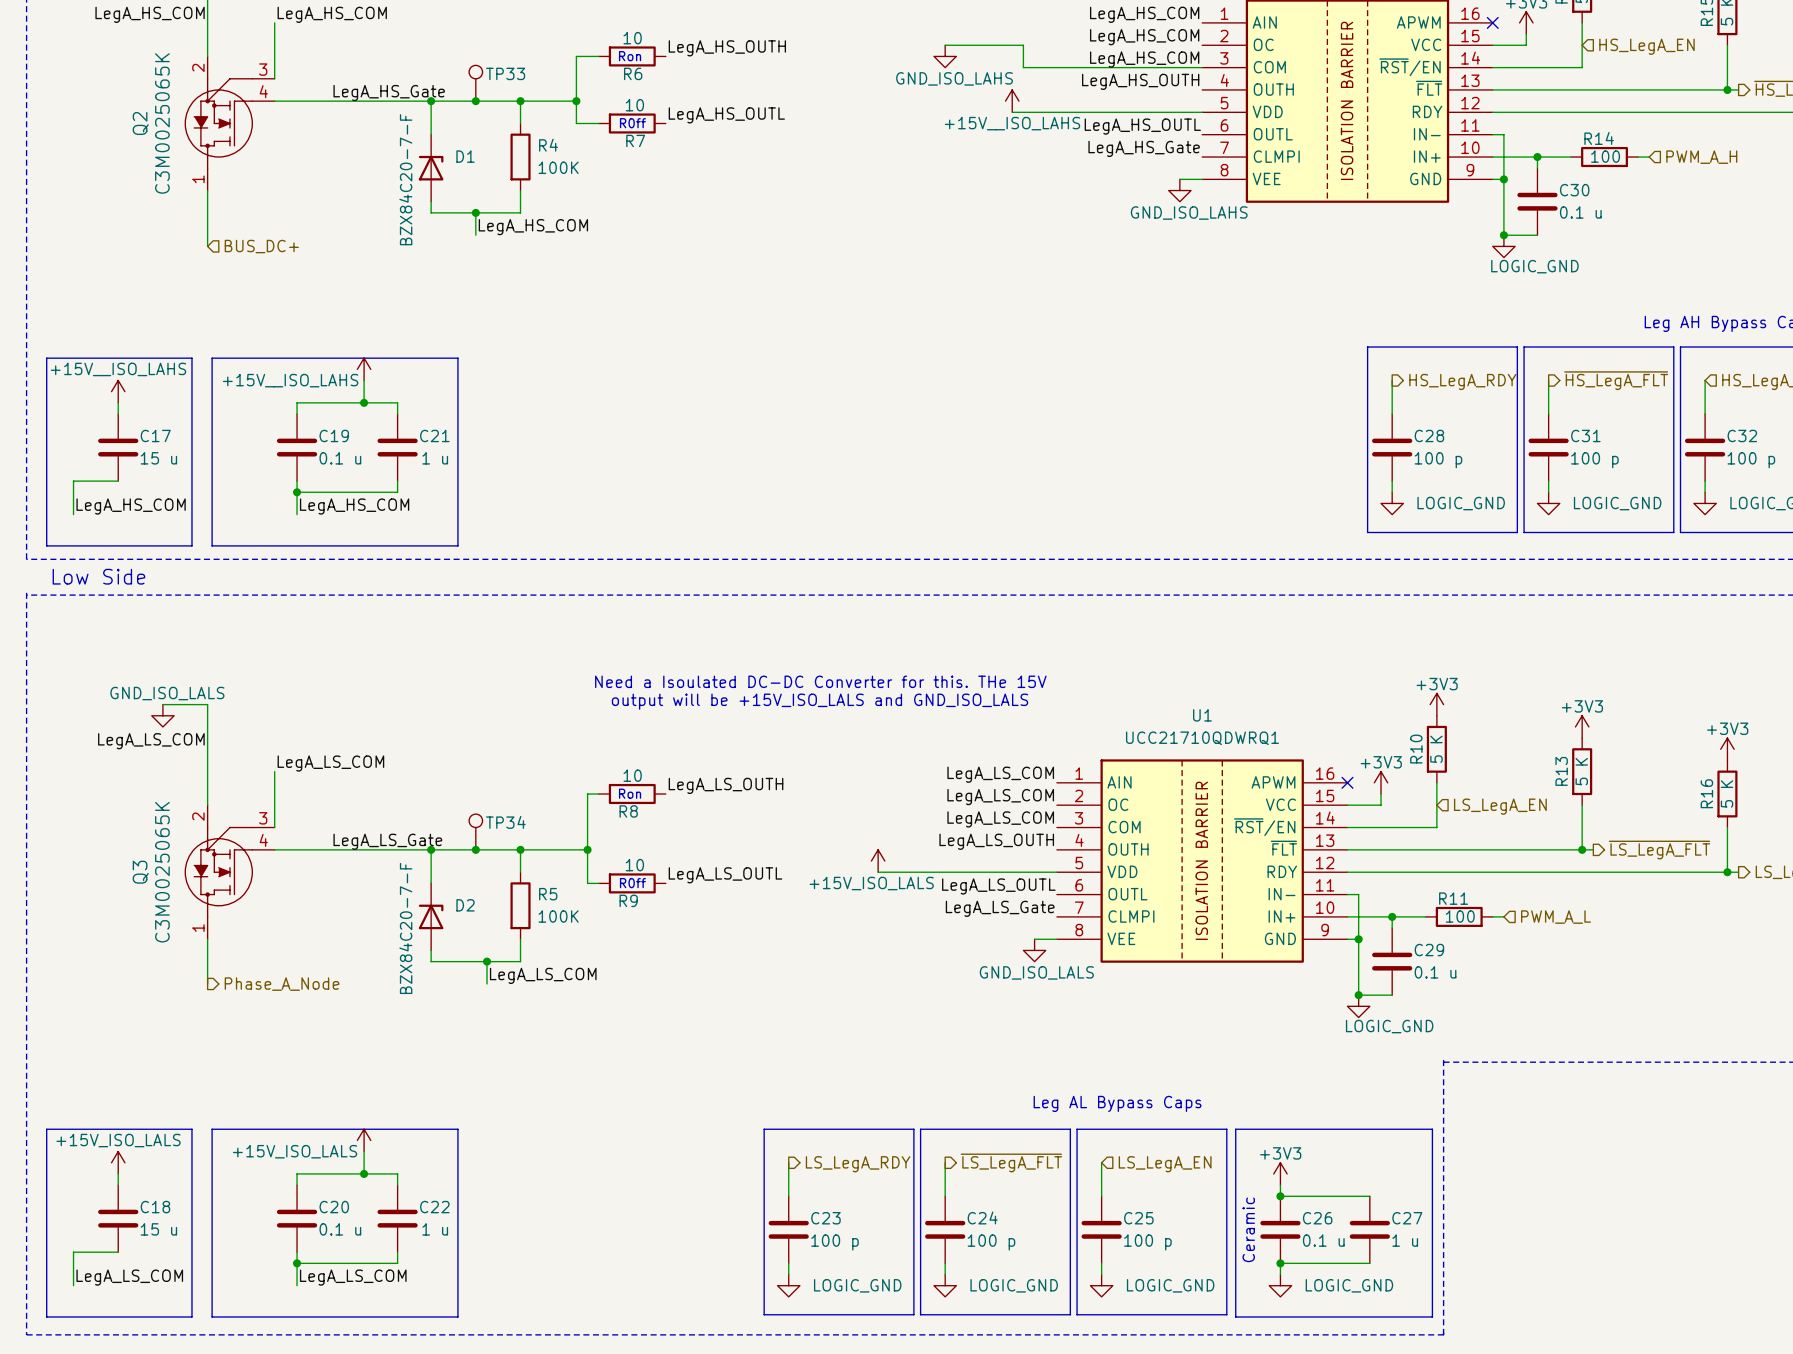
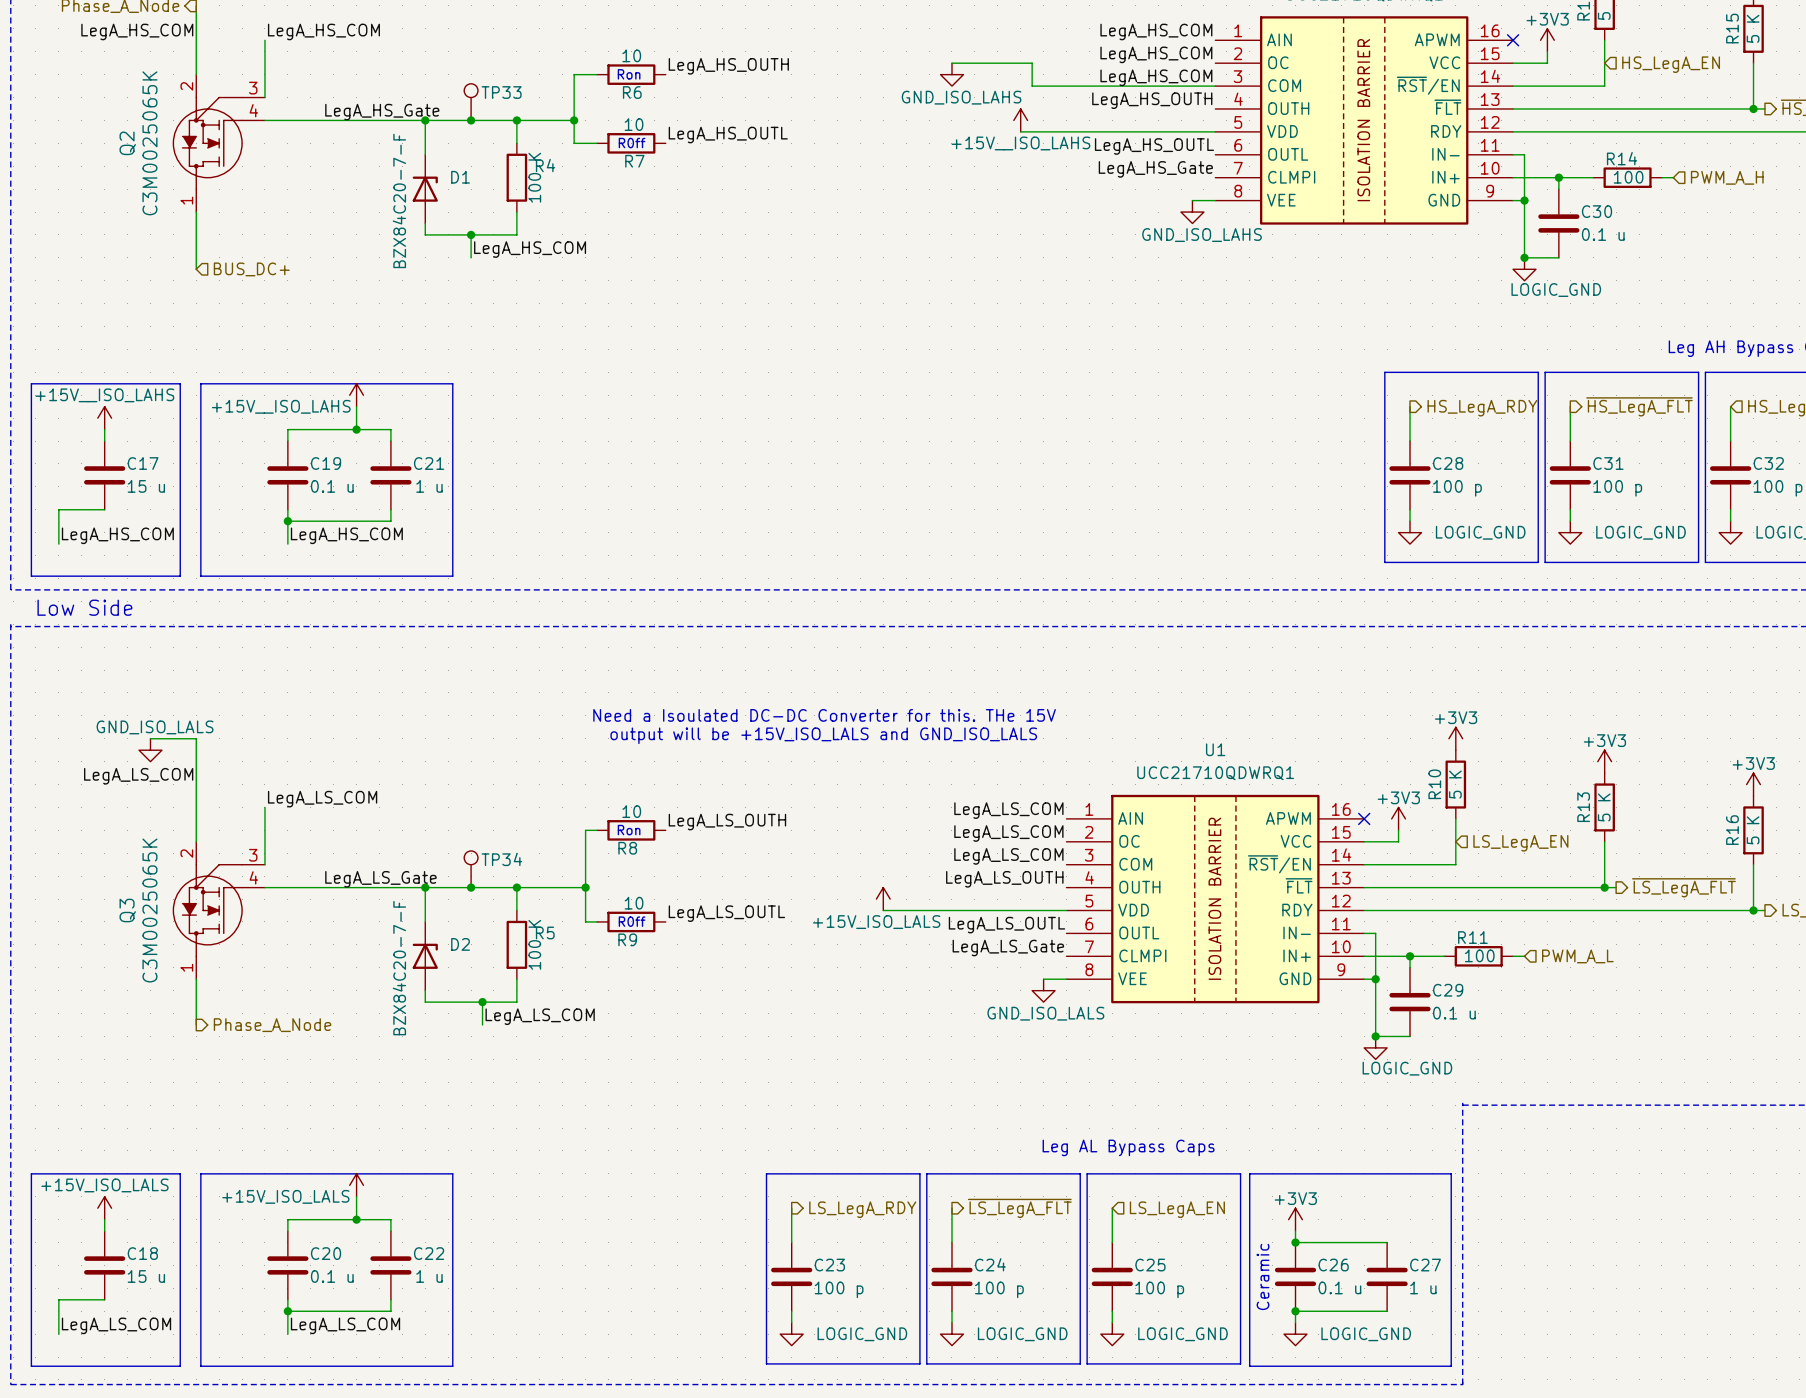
R4 value: 100K (558, 167) -> 100 K (534, 177)
R5 value: 100K (558, 916) -> 100 K (534, 944)

